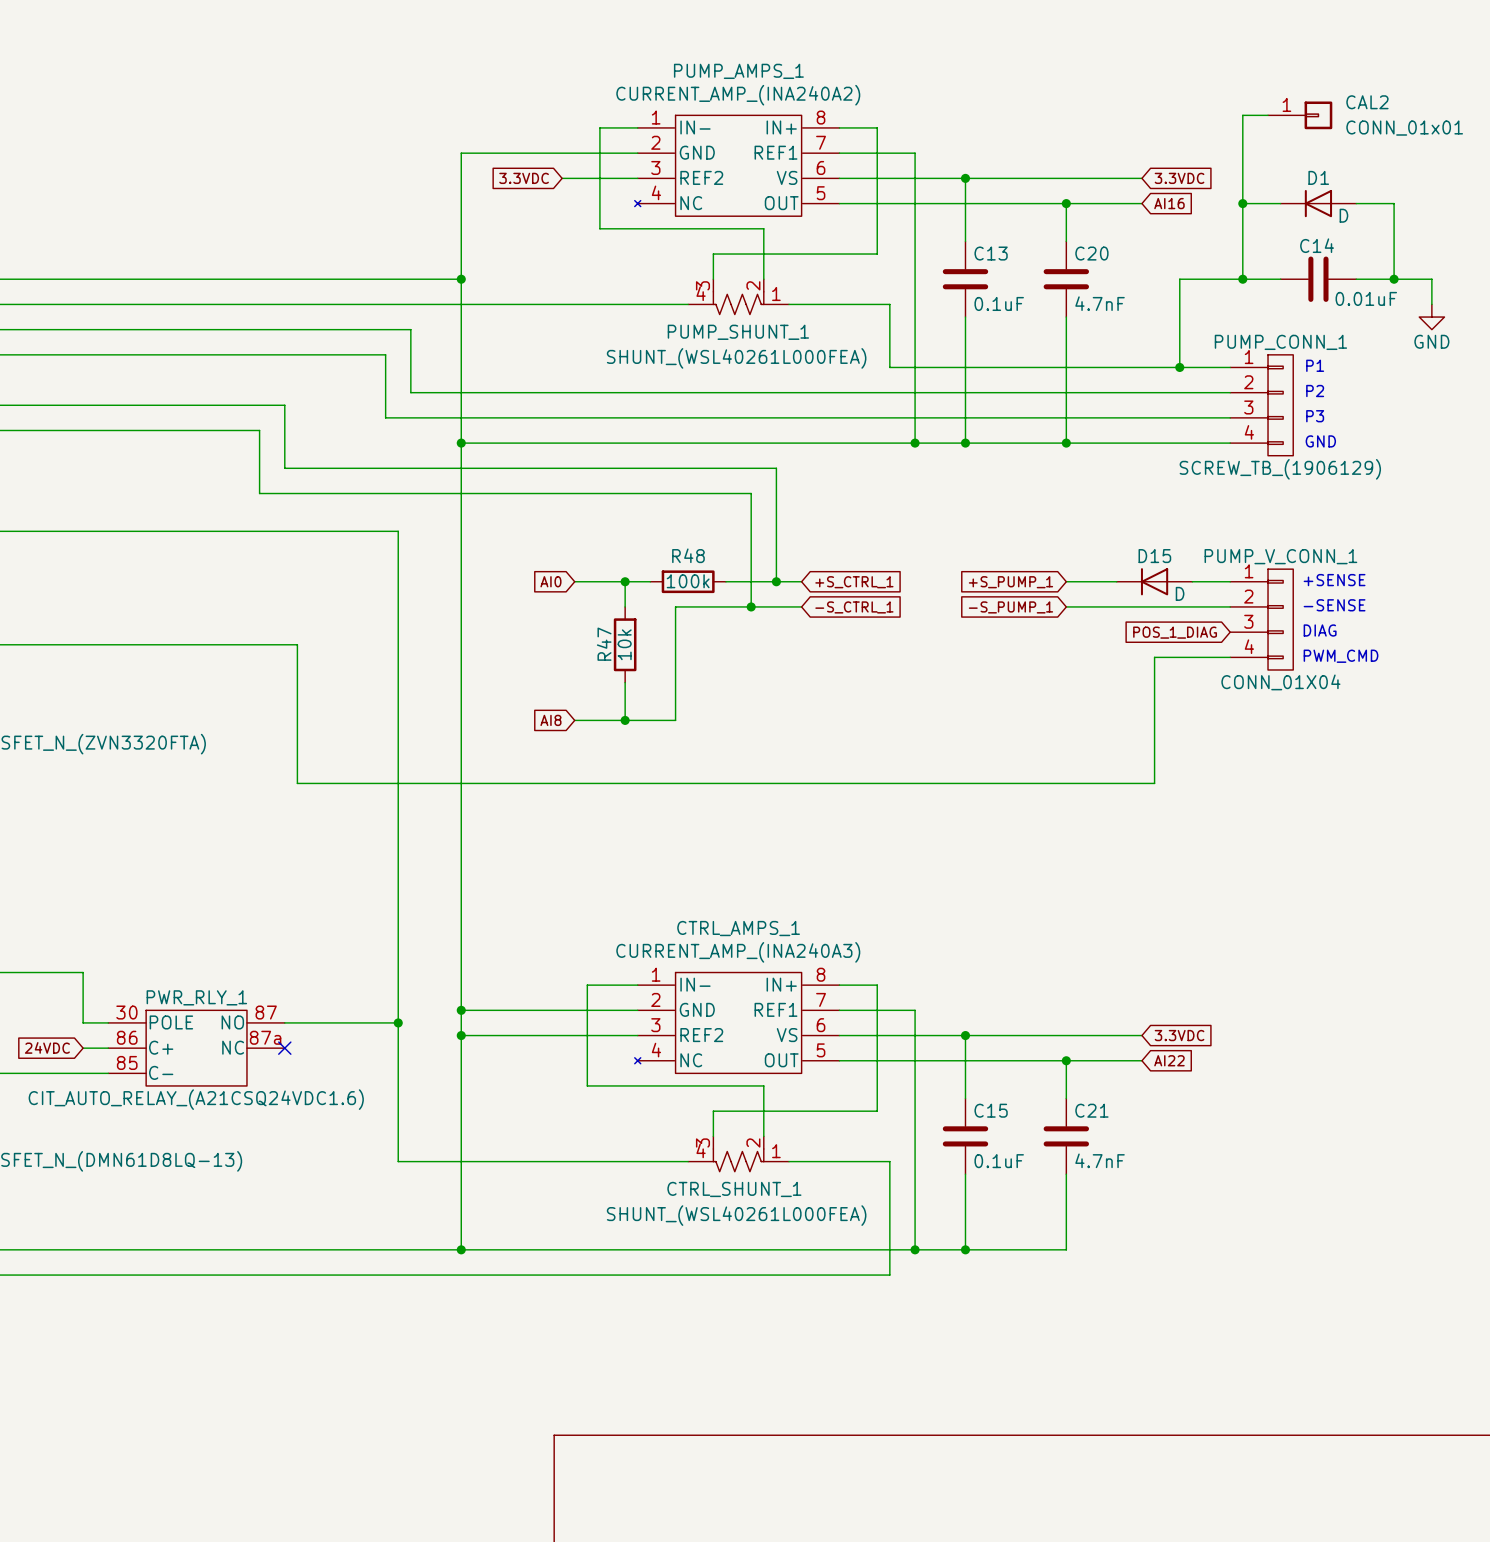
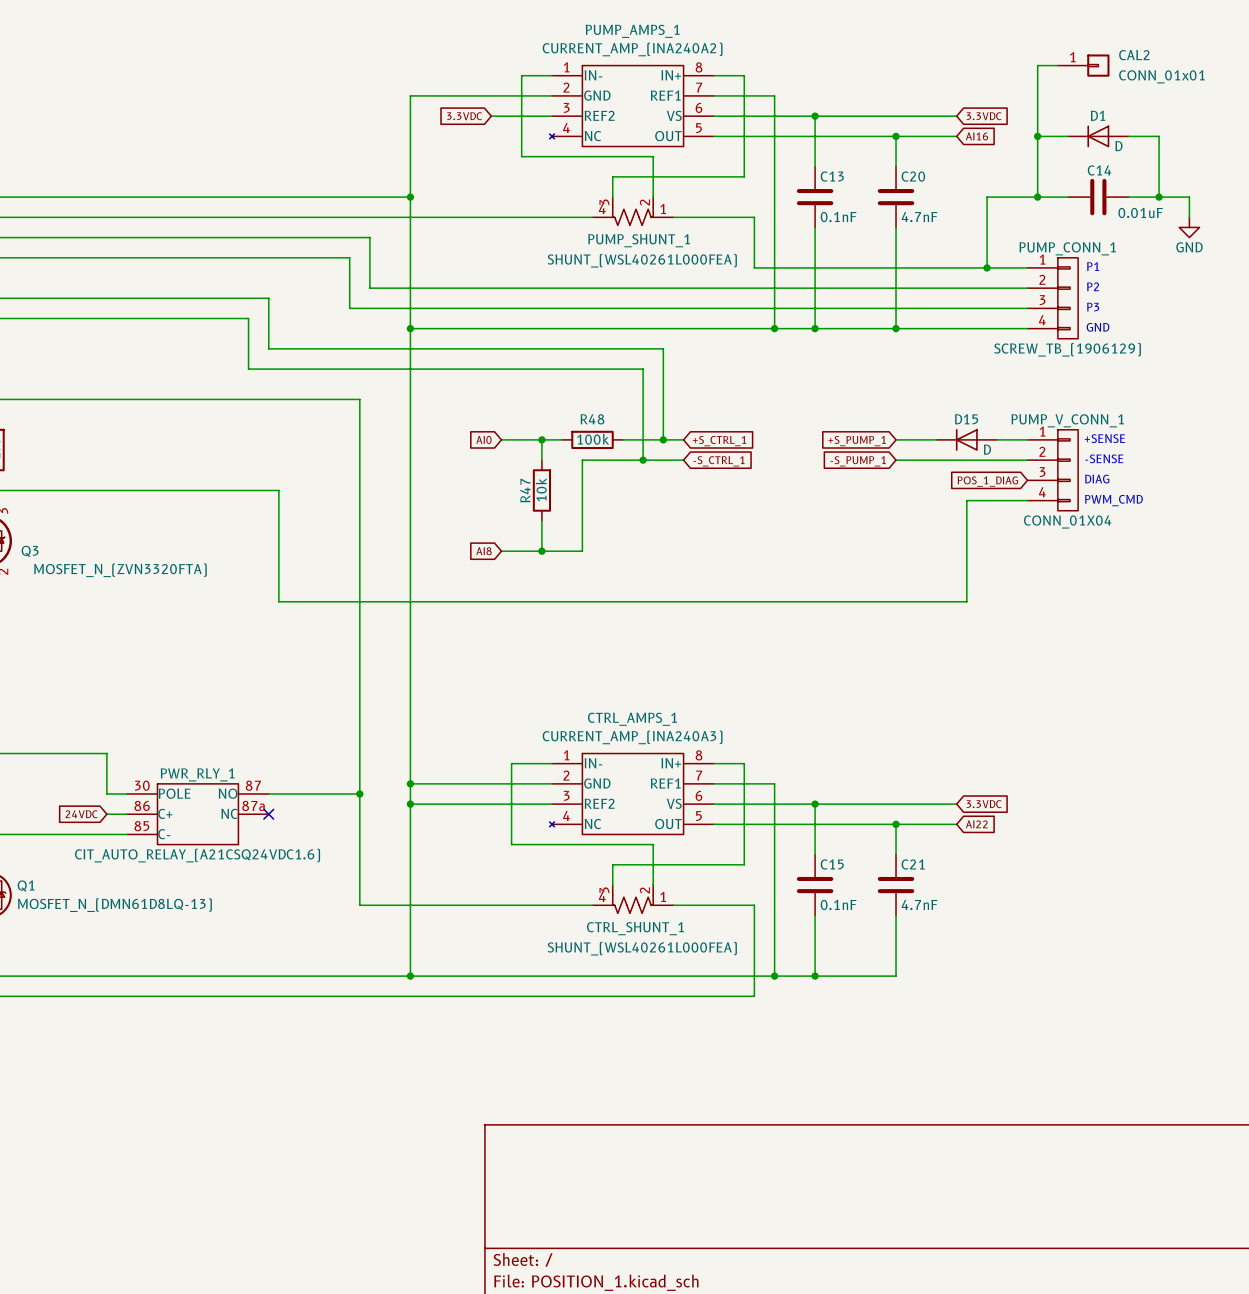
C13 value: 0.1uF (999, 303) -> 0.1nF (838, 217)
C15 value: 0.1uF (999, 1161) -> 0.1nF (838, 904)

